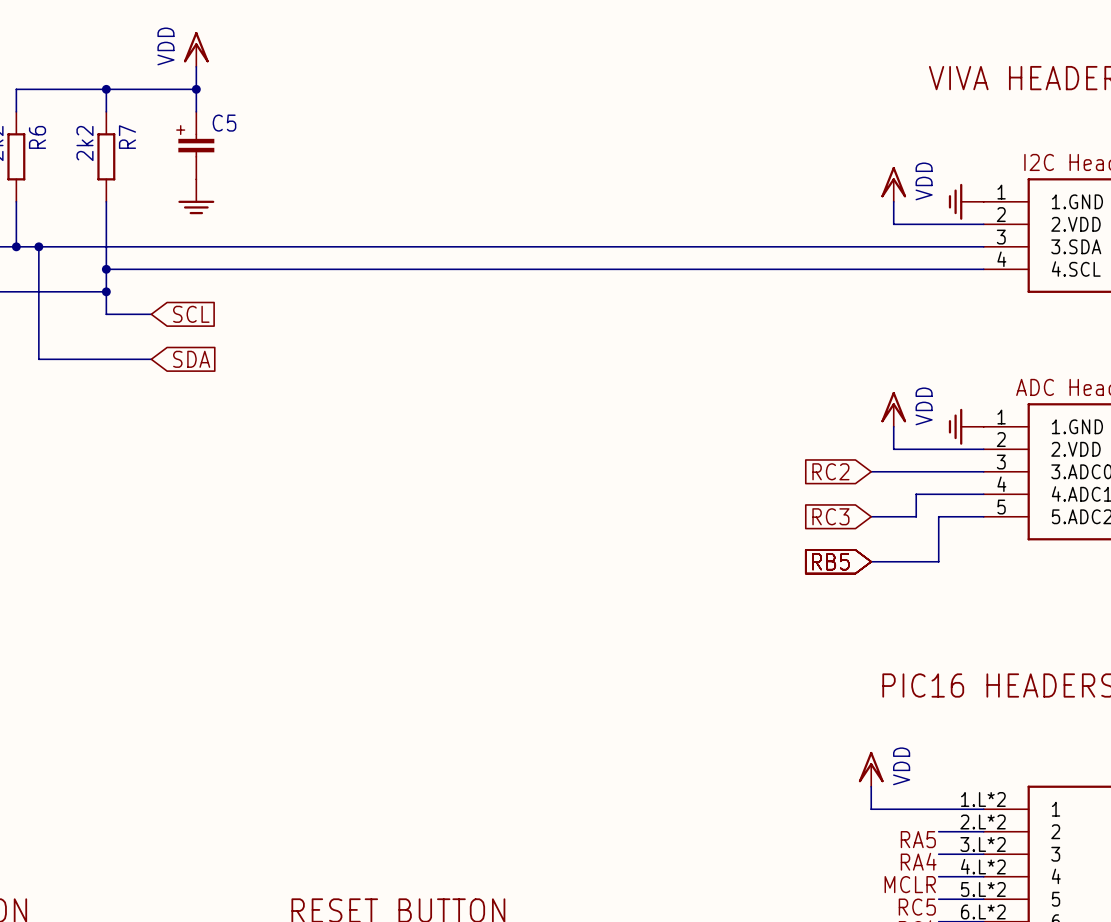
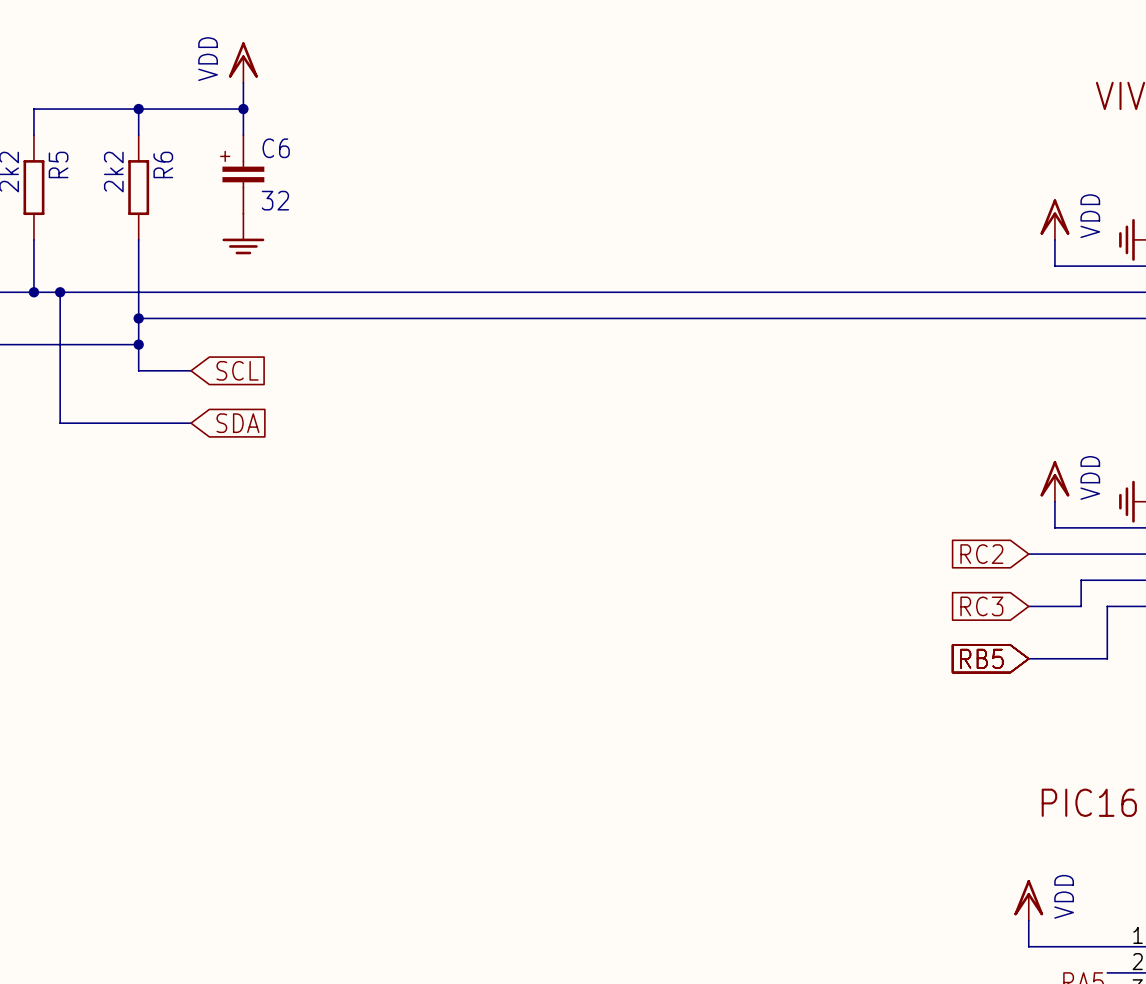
C5 name: C5 (224, 123) -> C6 (276, 148)
R6 name: R6 (37, 137) -> R5 (58, 164)
R7 name: R7 (127, 137) -> R6 (163, 164)
C5 value: none -> 32 (275, 200)

